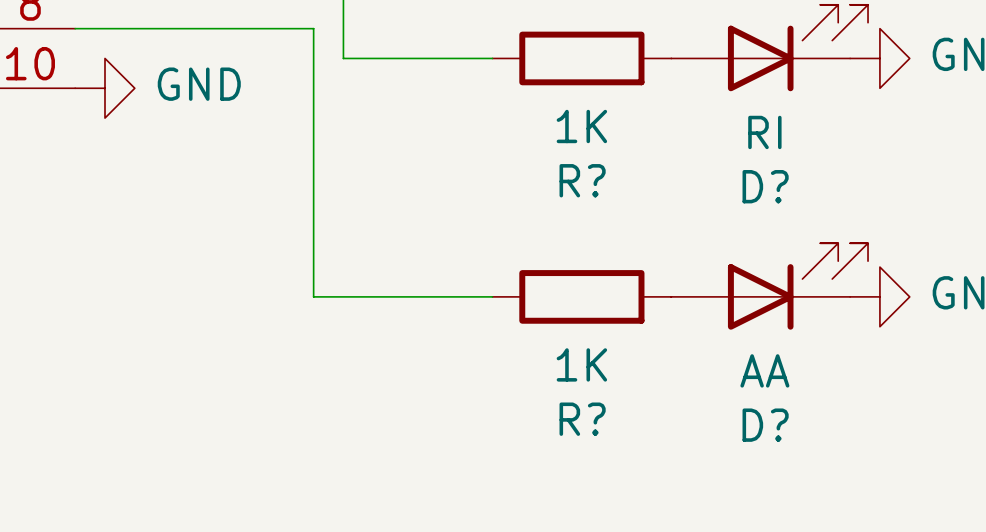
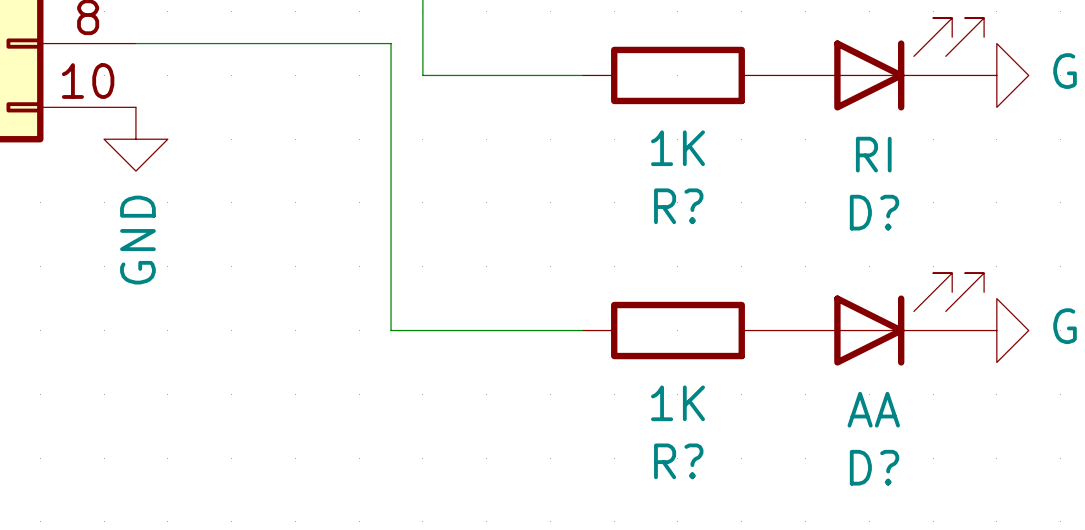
power symbol rotation: 0° (105, 88) -> 90° clockwise (135, 139)
power symbol position: GND (105, 88) -> GND (135, 139)

